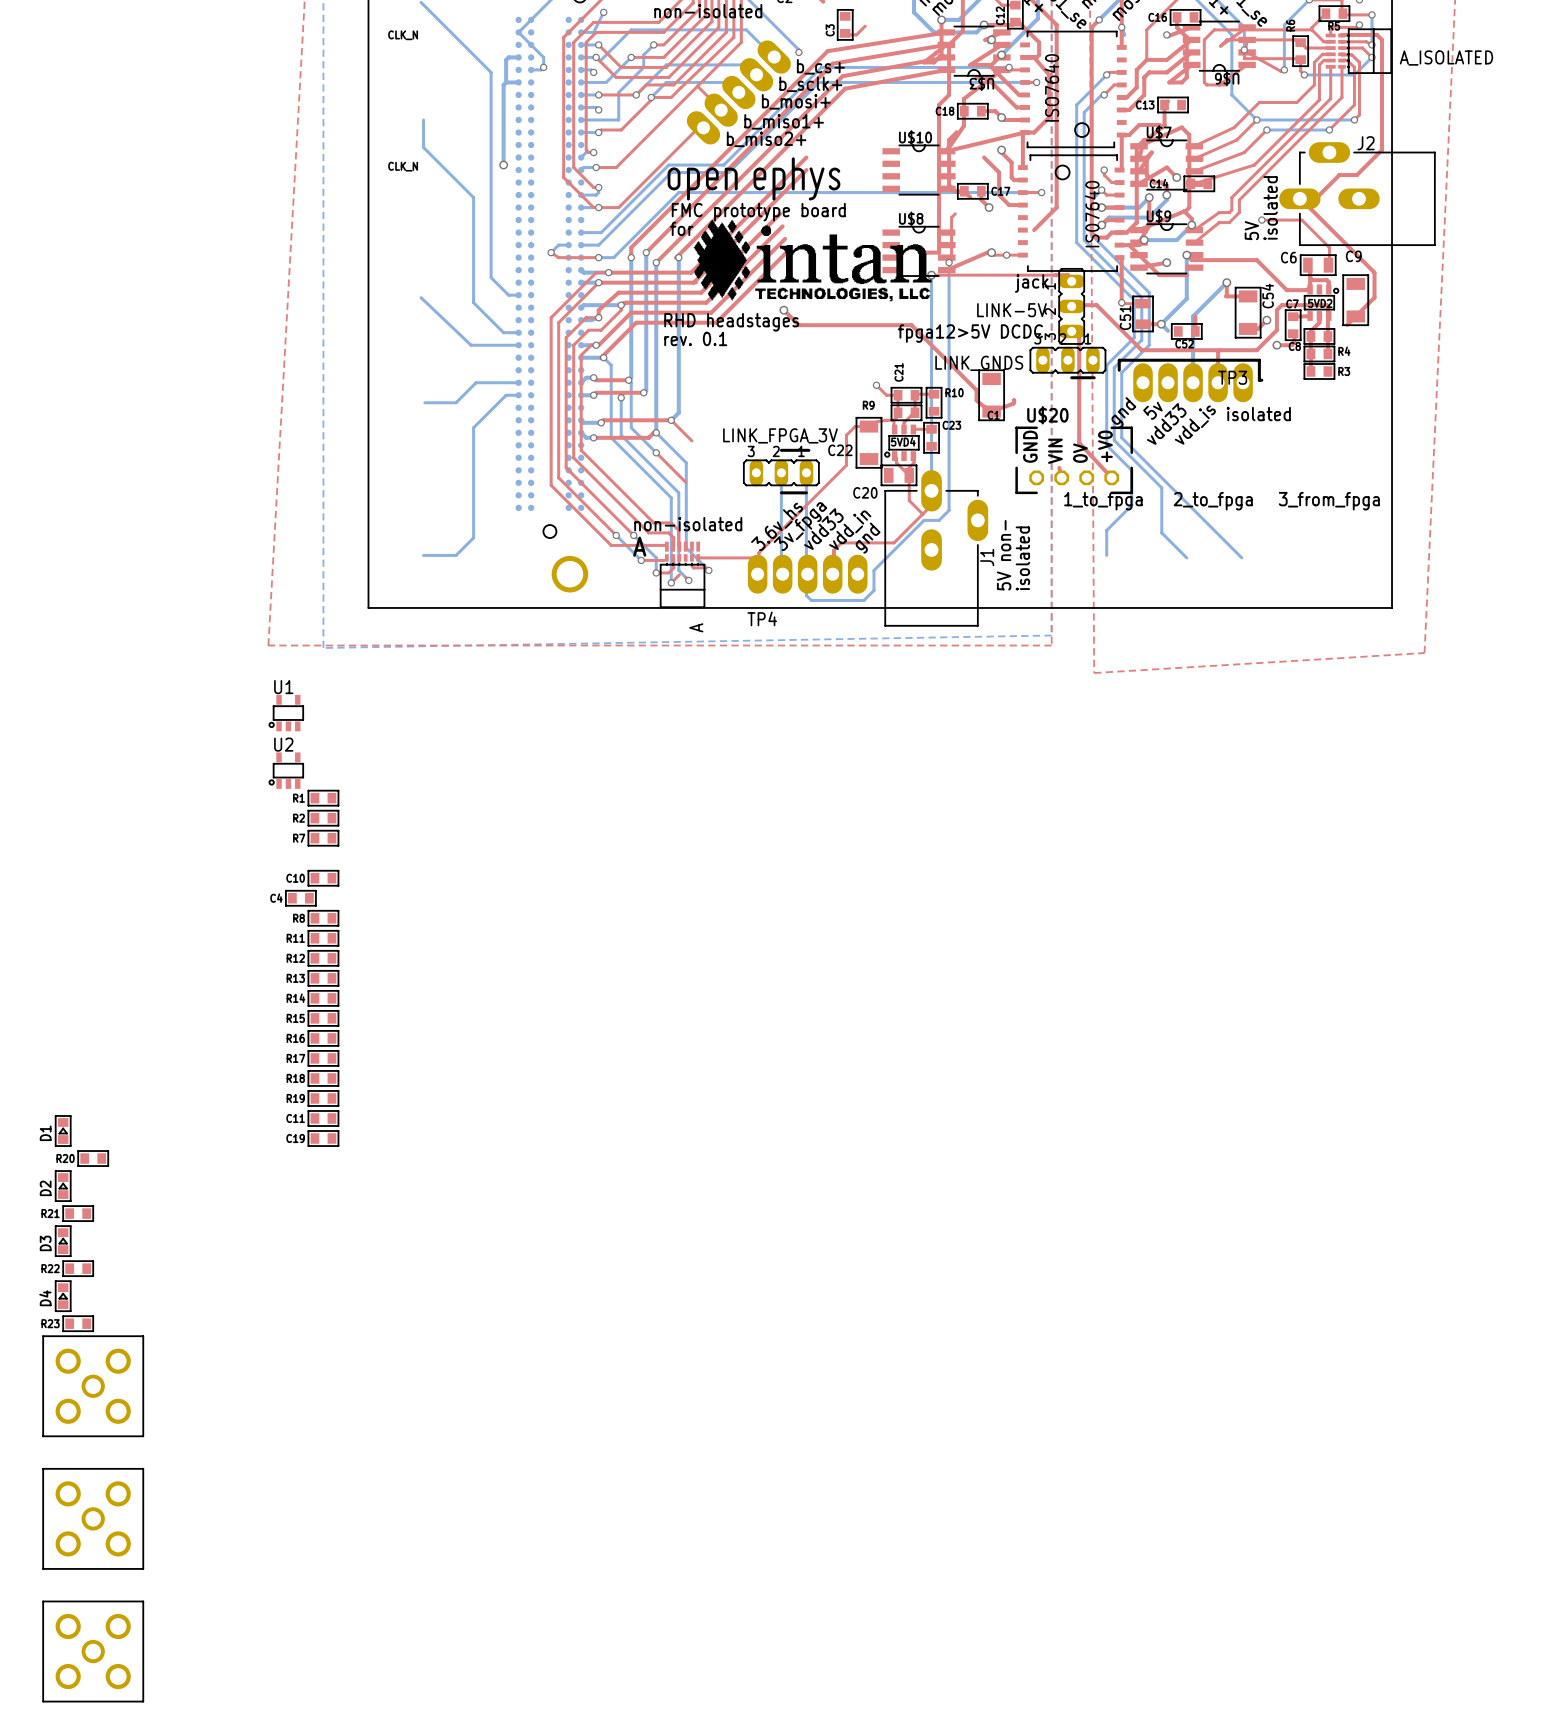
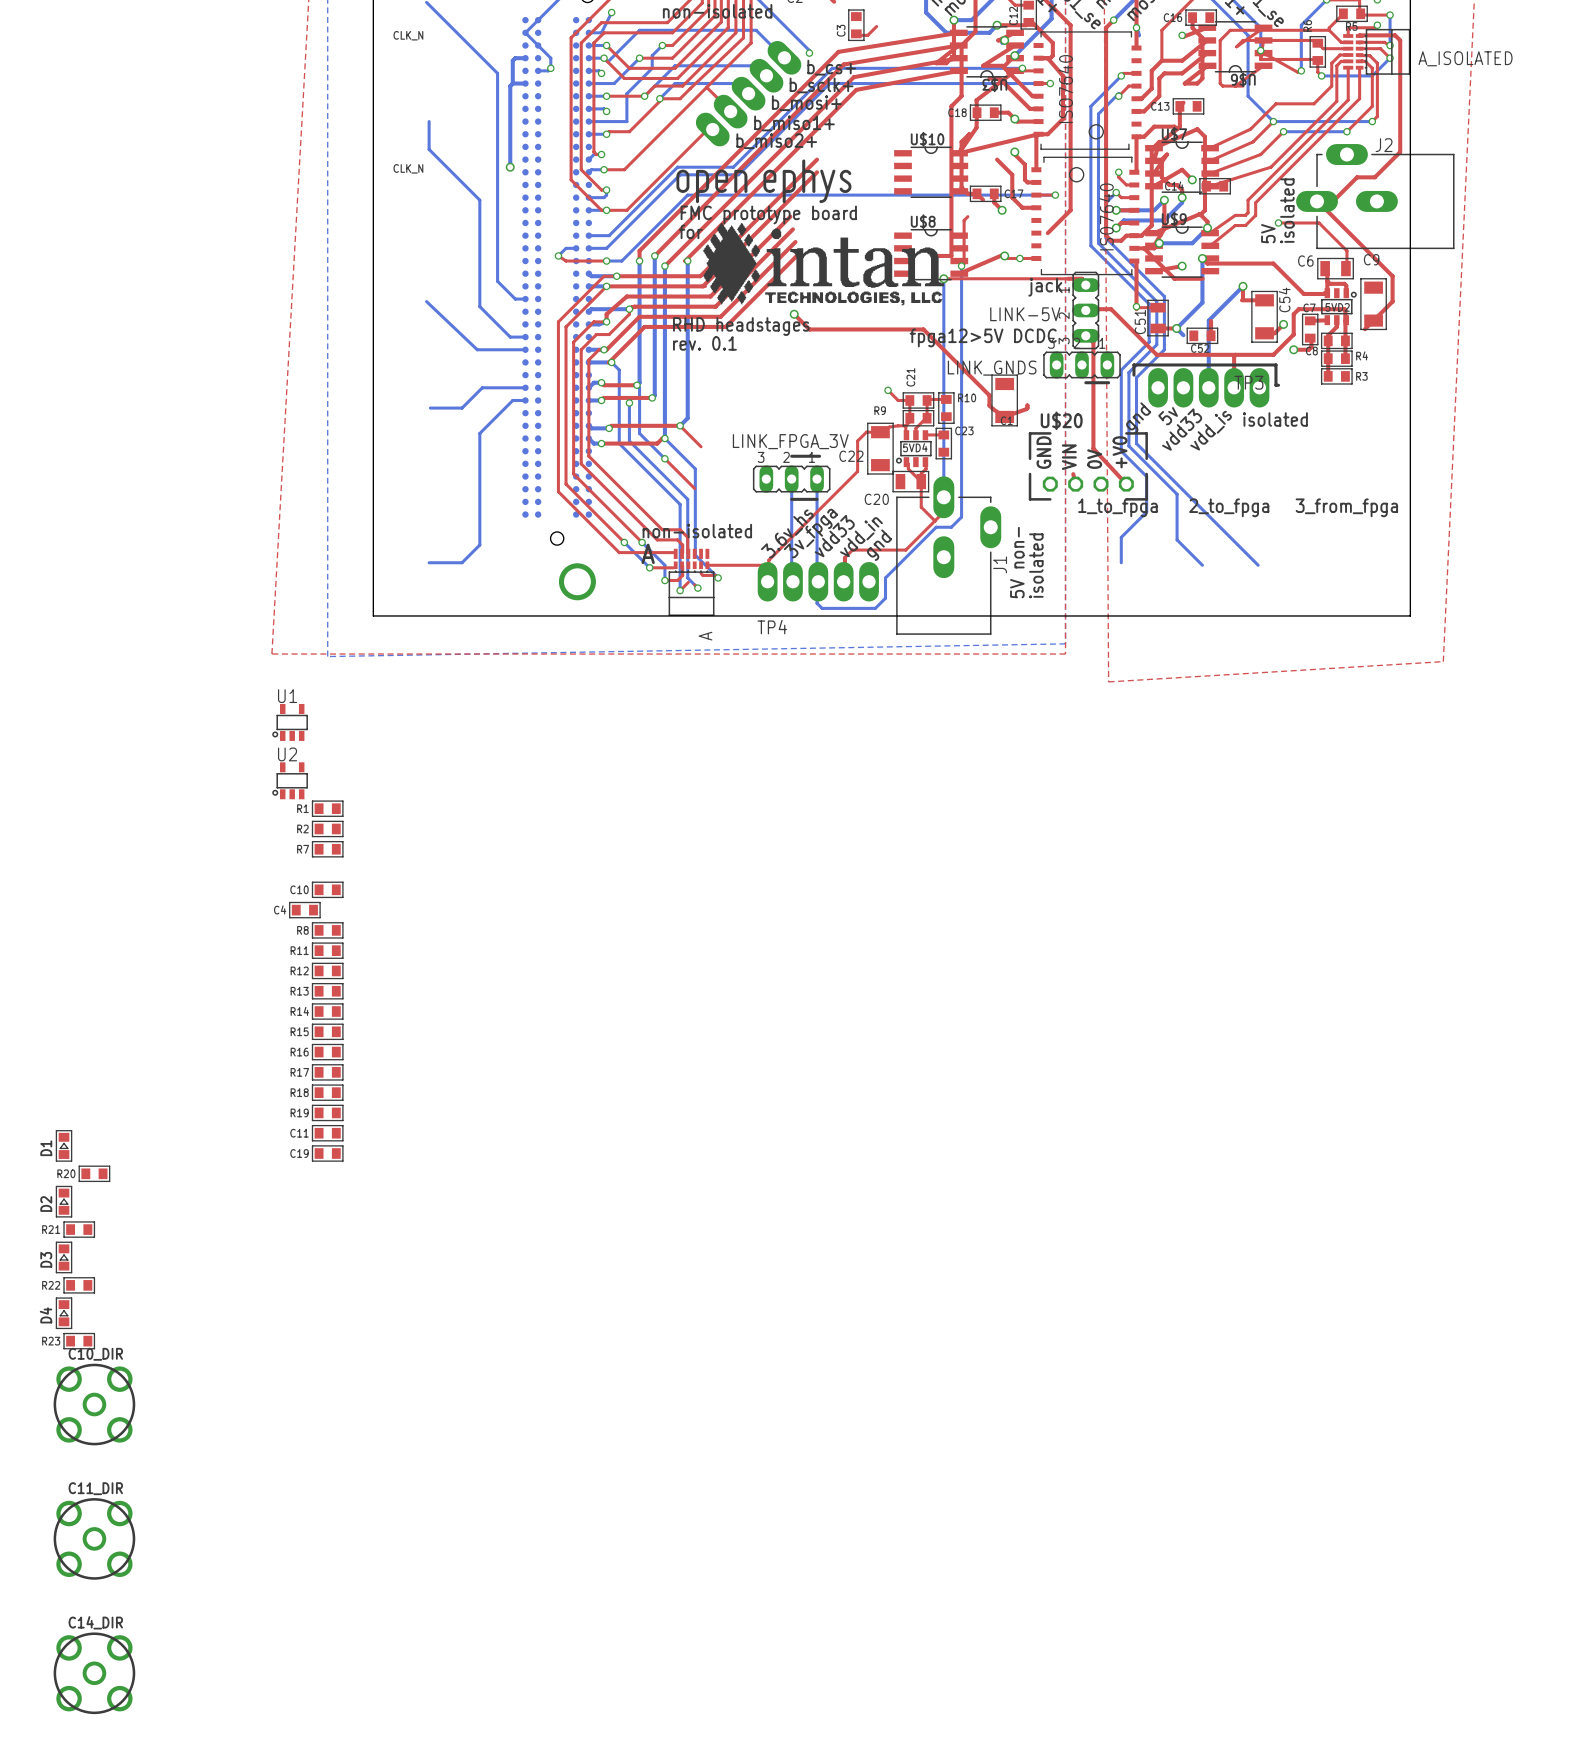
part: (93, 1386) -> none
C10_DIR: none -> (94, 1404)
part: (93, 1518) -> none
C11_DIR: none -> (94, 1538)
part: (93, 1651) -> none
C14_DIR: none -> (94, 1673)

